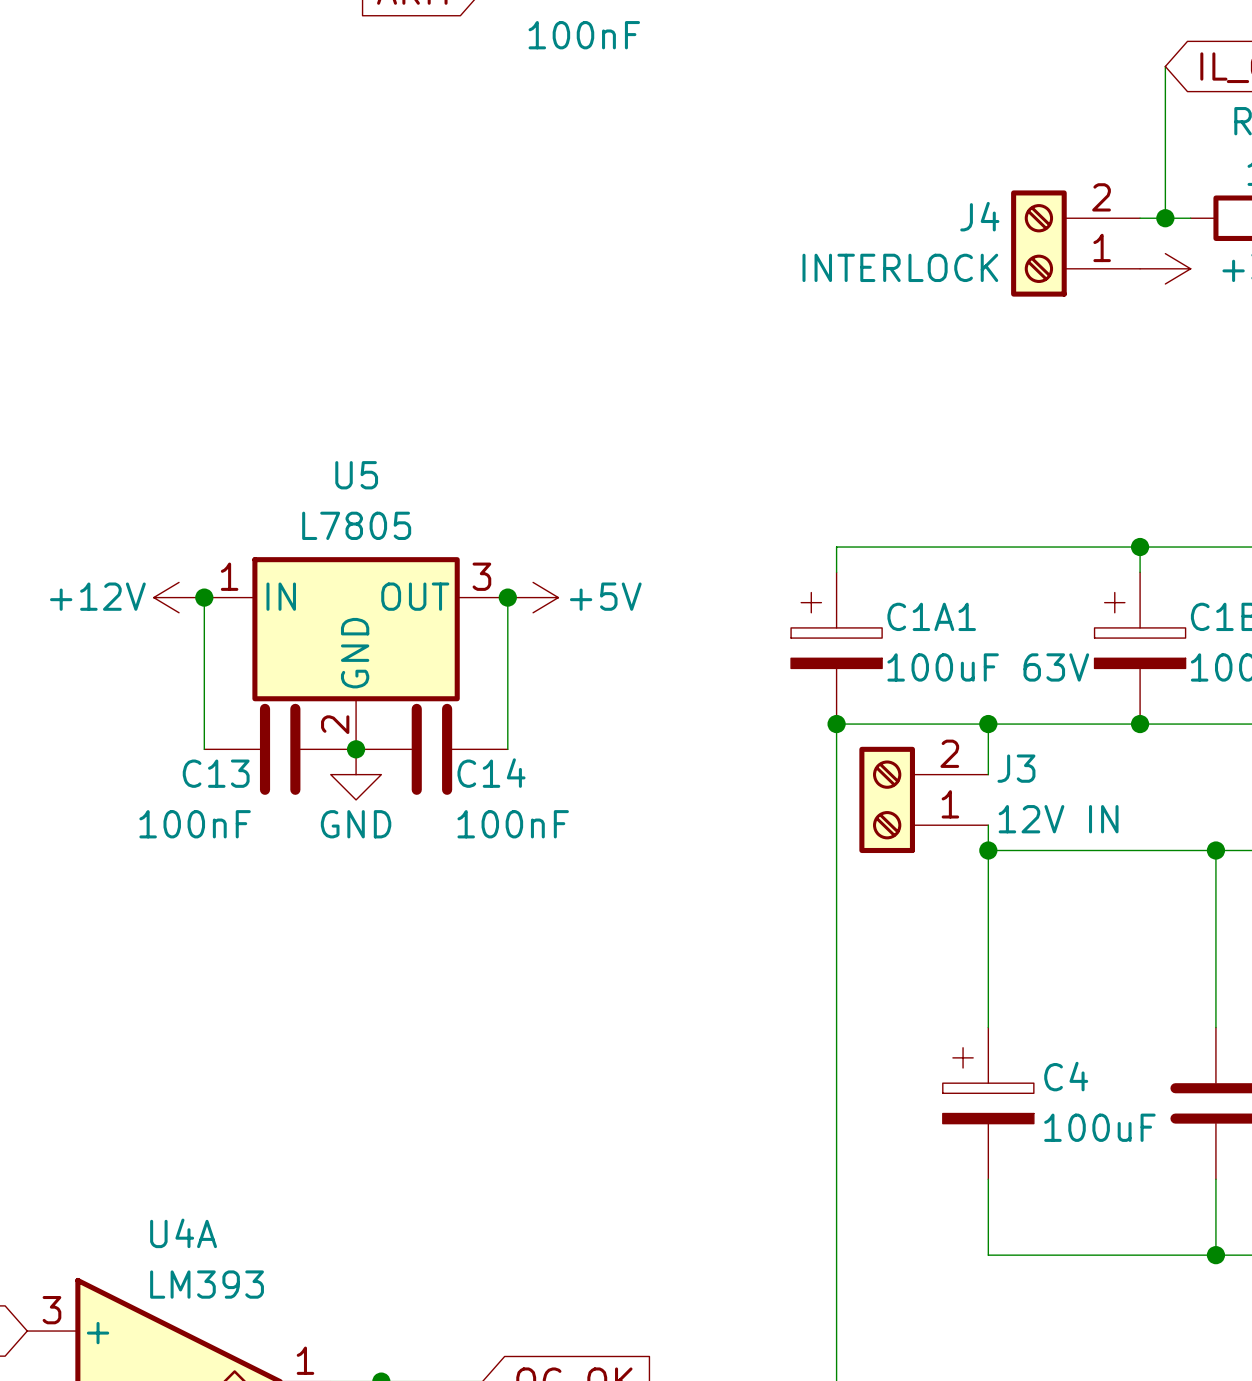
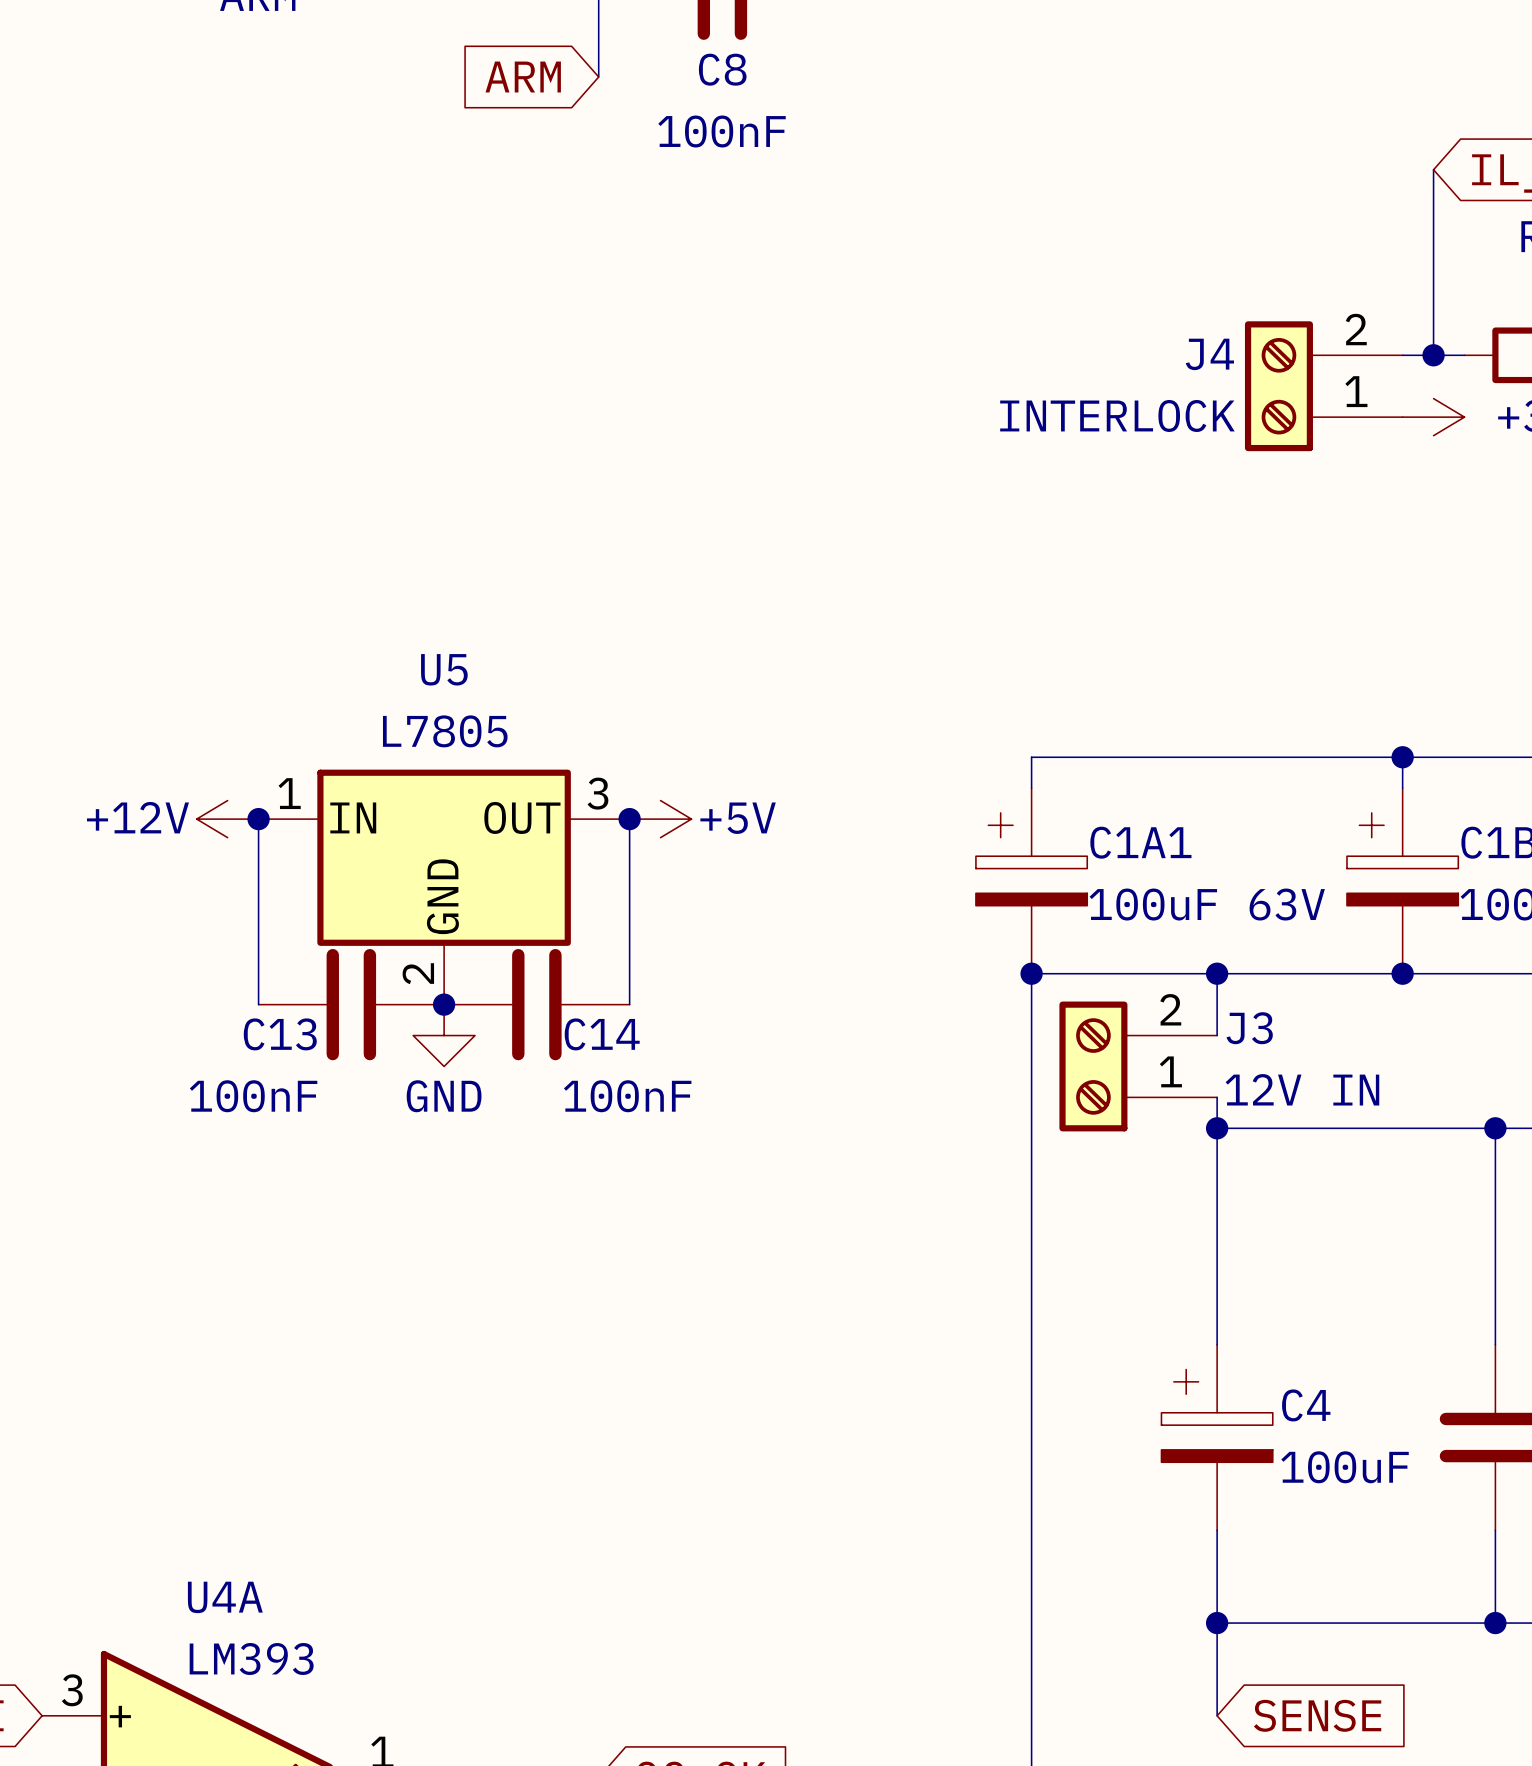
wire: none -> (1217, 1623) (1217, 1715)
junction: none -> (1217, 1623)
global label: none -> SENSE (1317, 1715)

